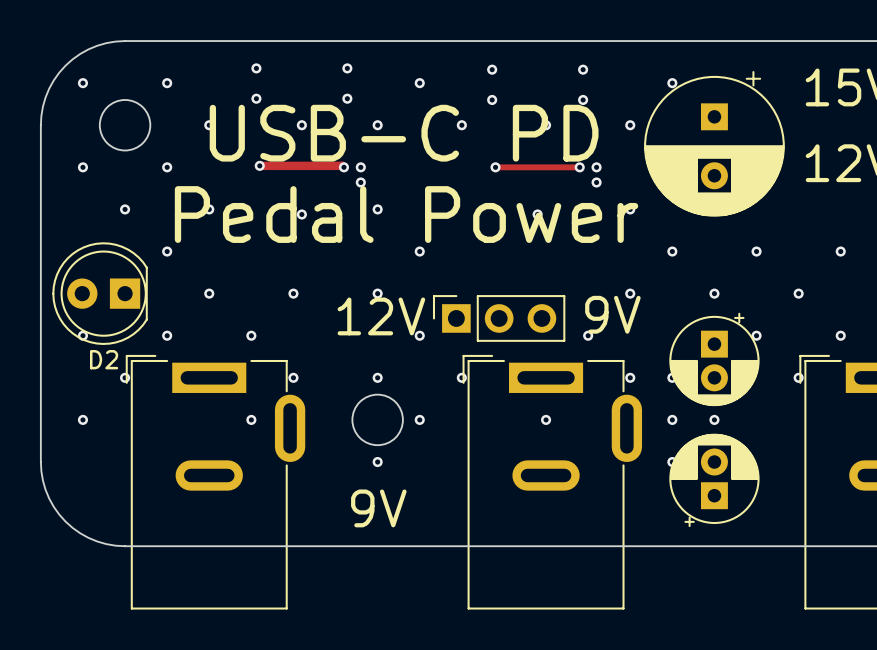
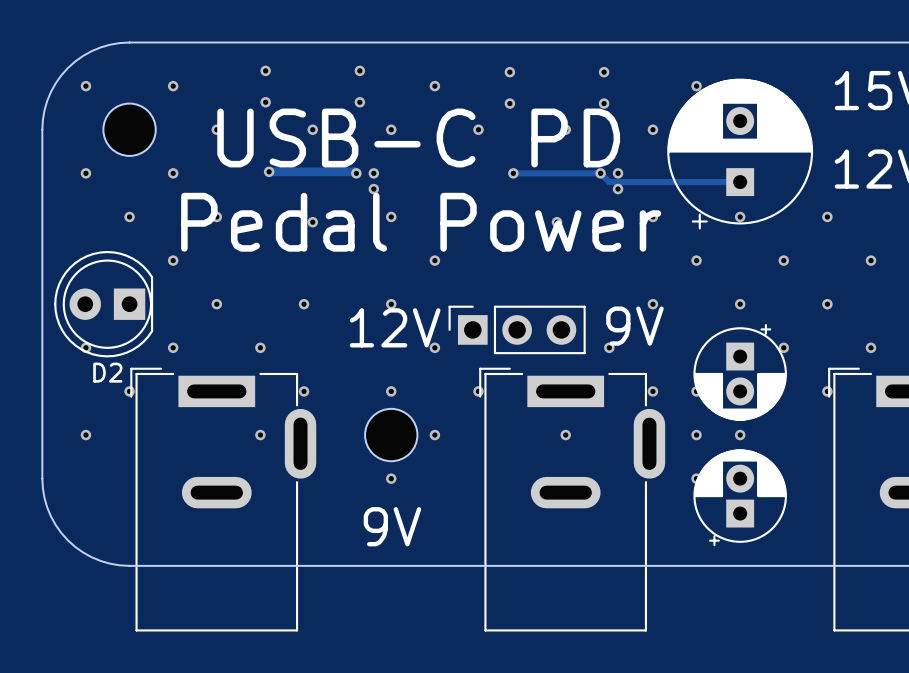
part rotation: 0° (714, 143) -> 180° (740, 154)
track: none -> (600, 173) (609, 182) (740, 182)
via: none -> (740, 216)
via: none -> (827, 216)

